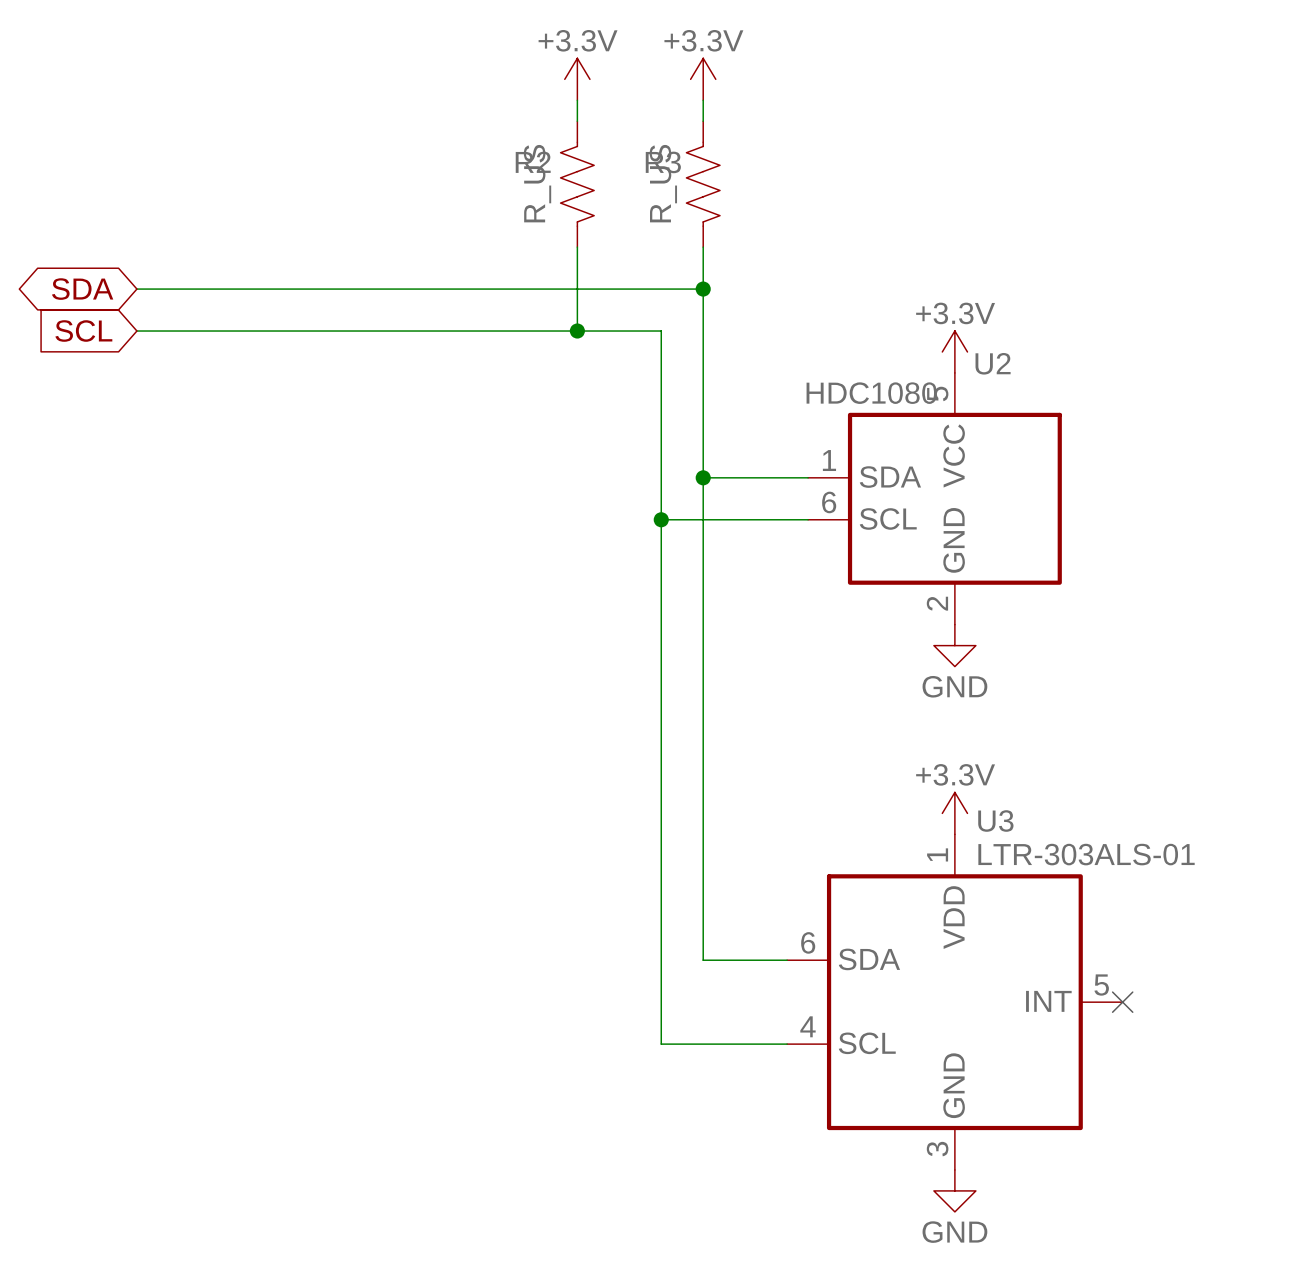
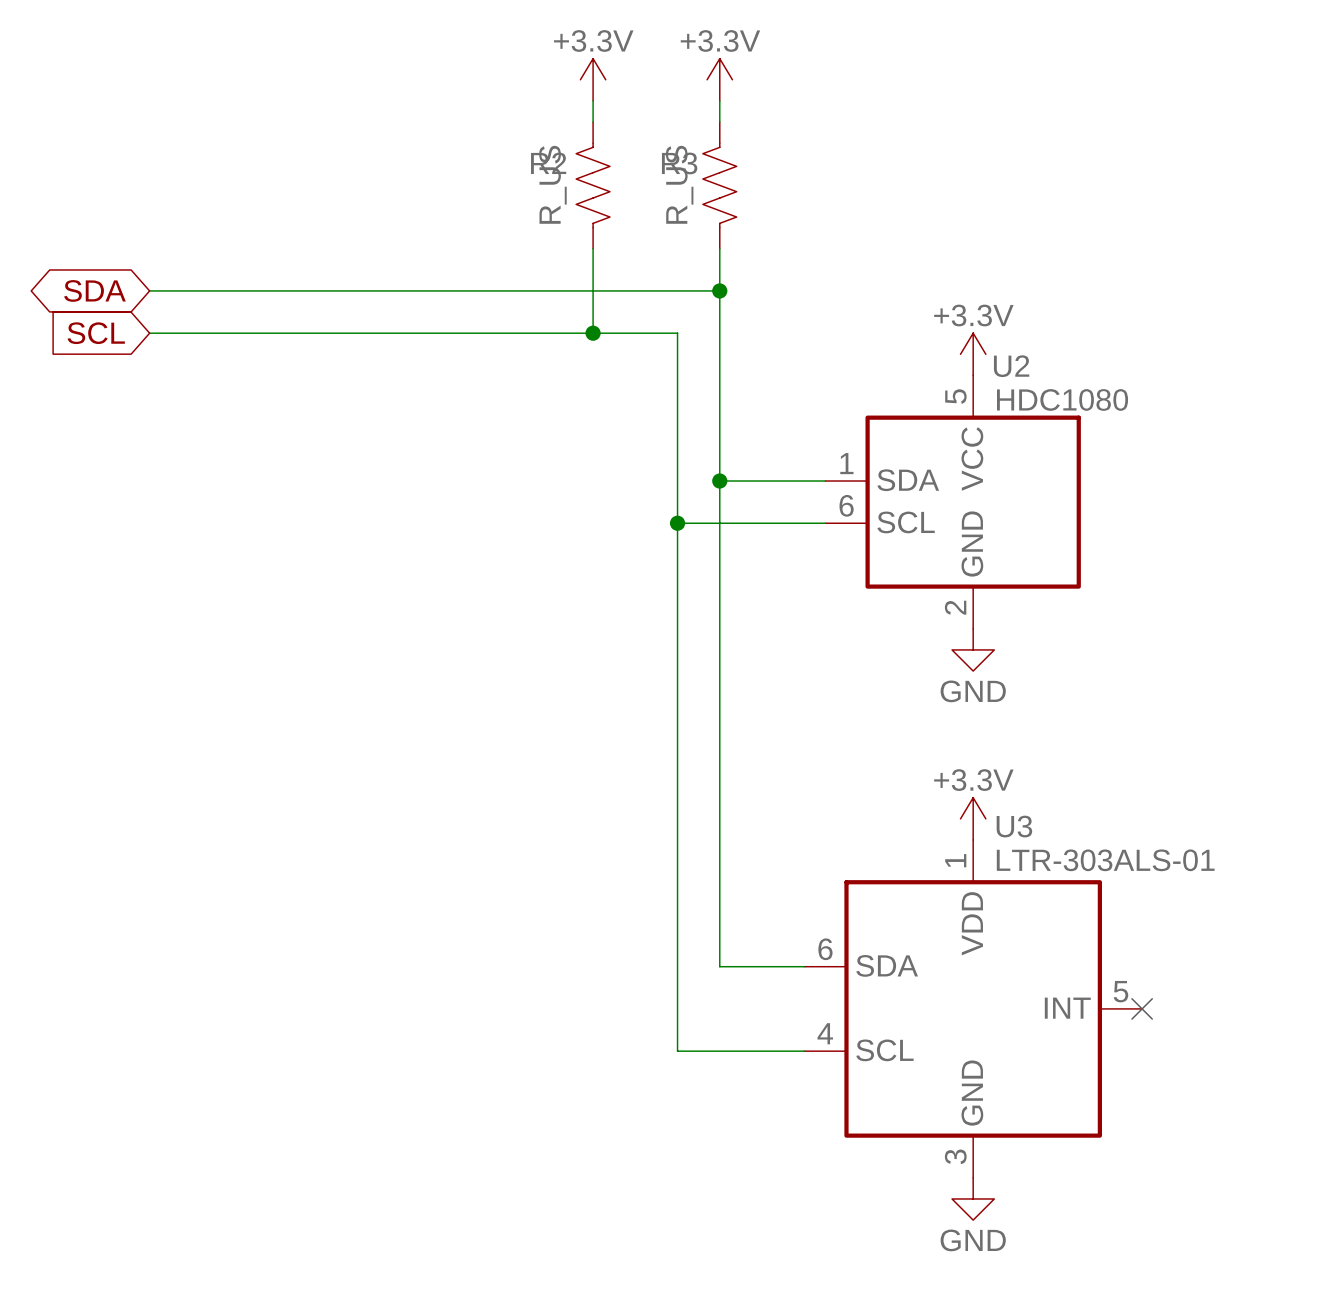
U2 value position: HDC1080 (871, 393) -> HDC1080 (1062, 399)

